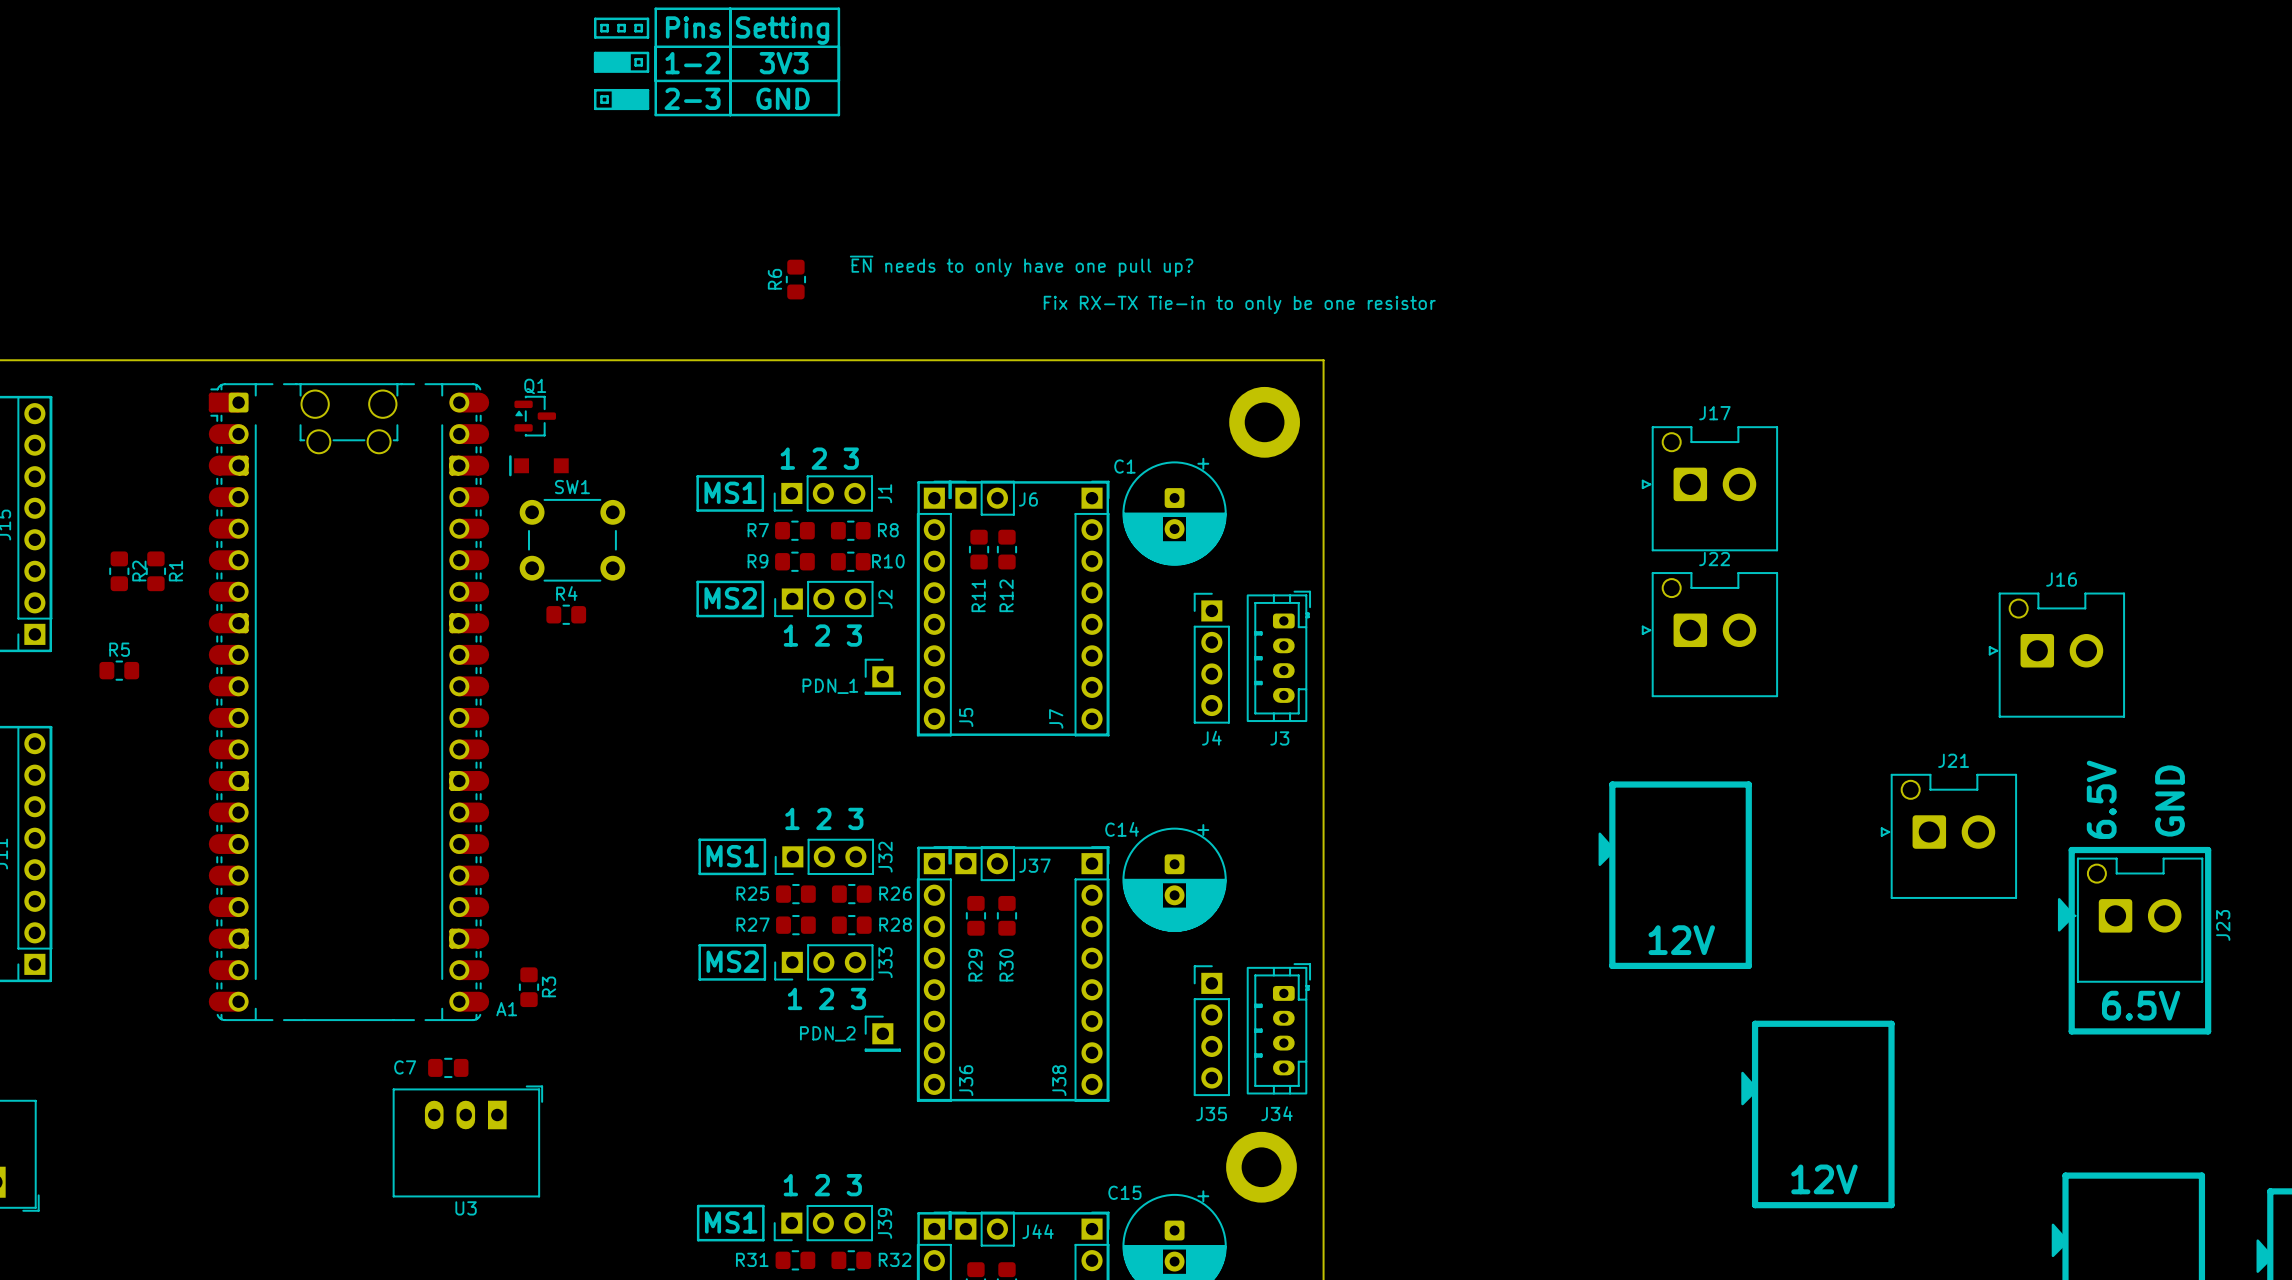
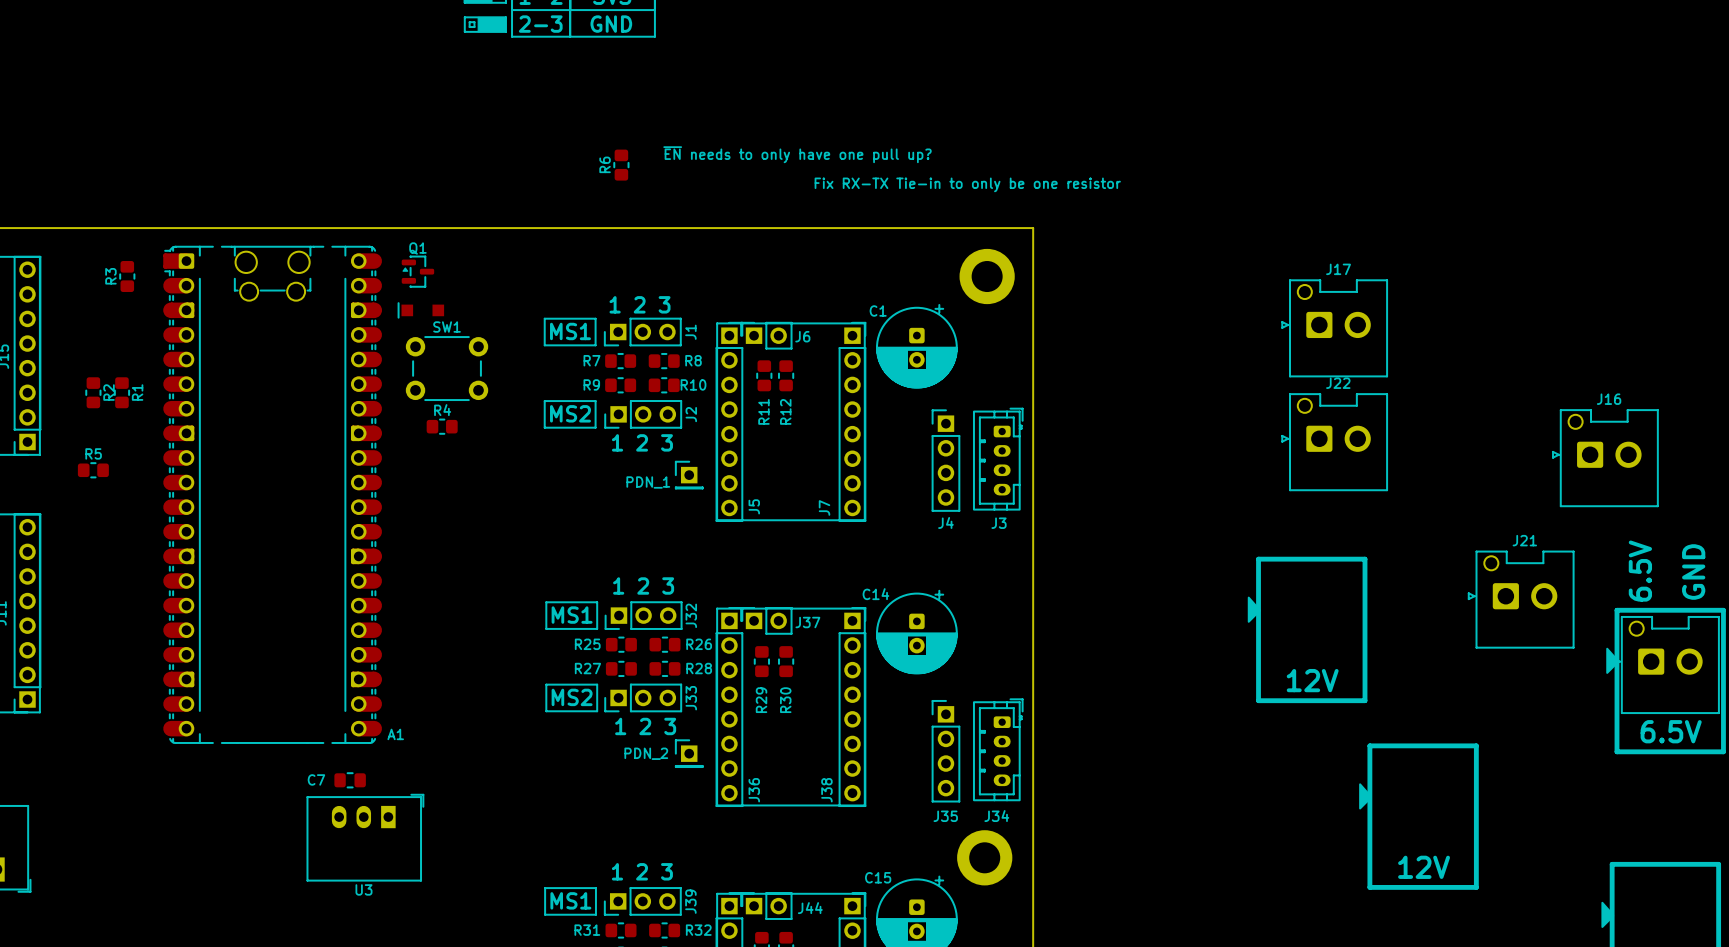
R3 name position: R3 (549, 986) -> R3 (110, 276)
R3 position: (529, 987) -> (127, 276)

